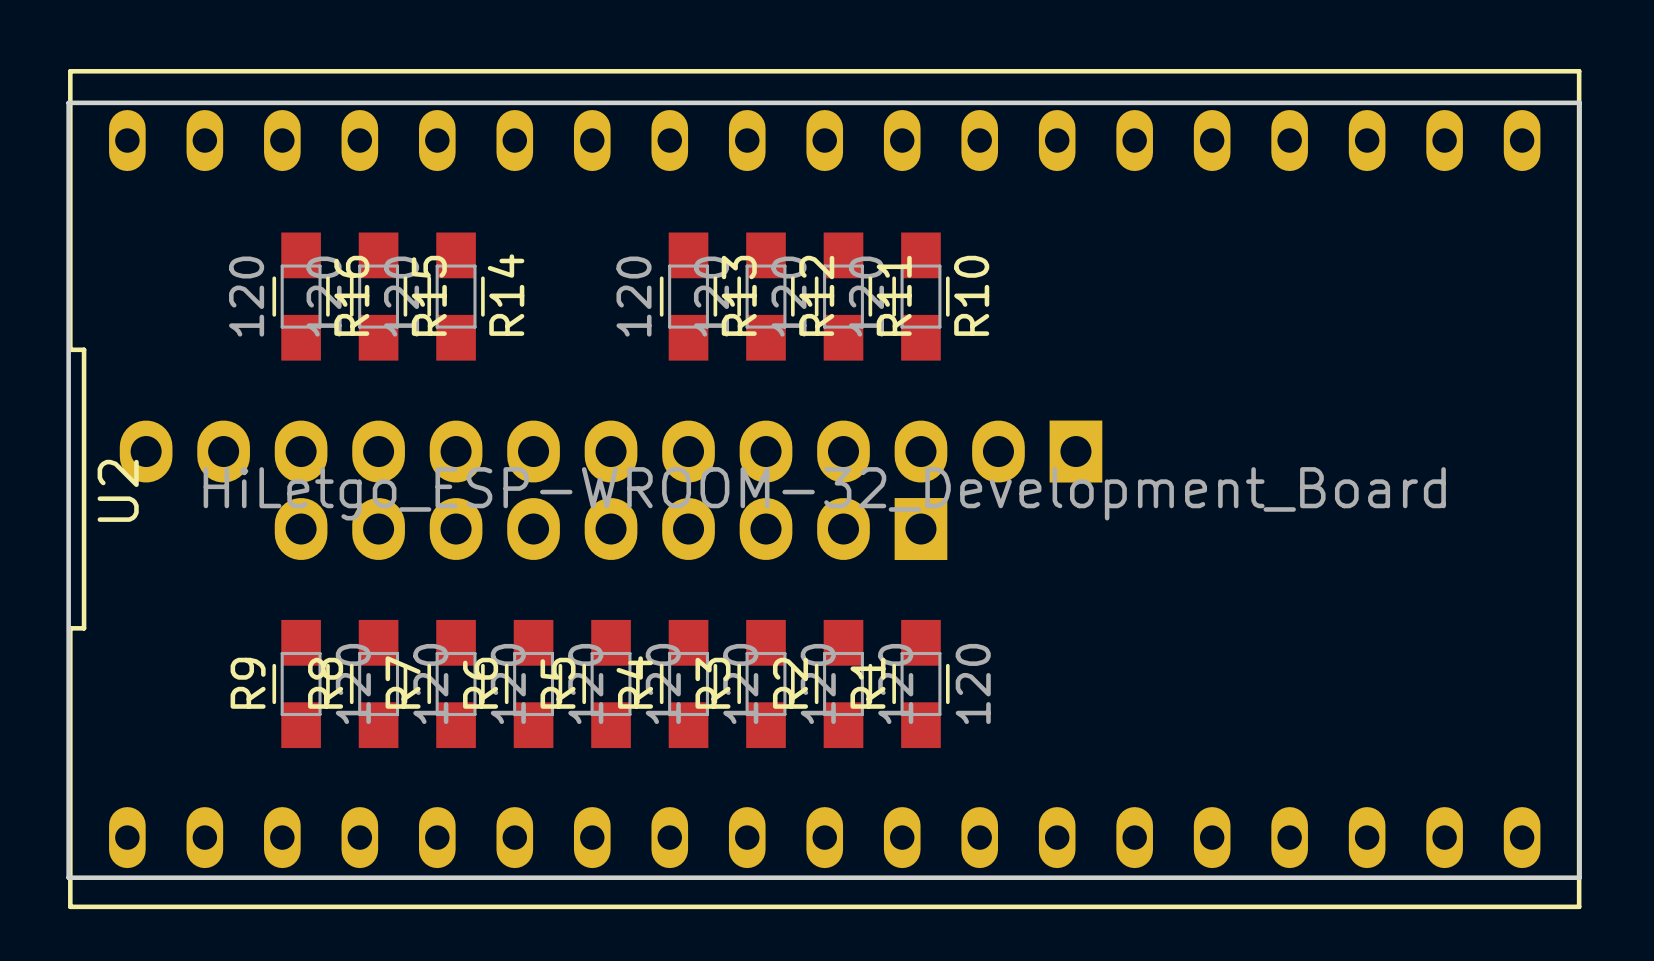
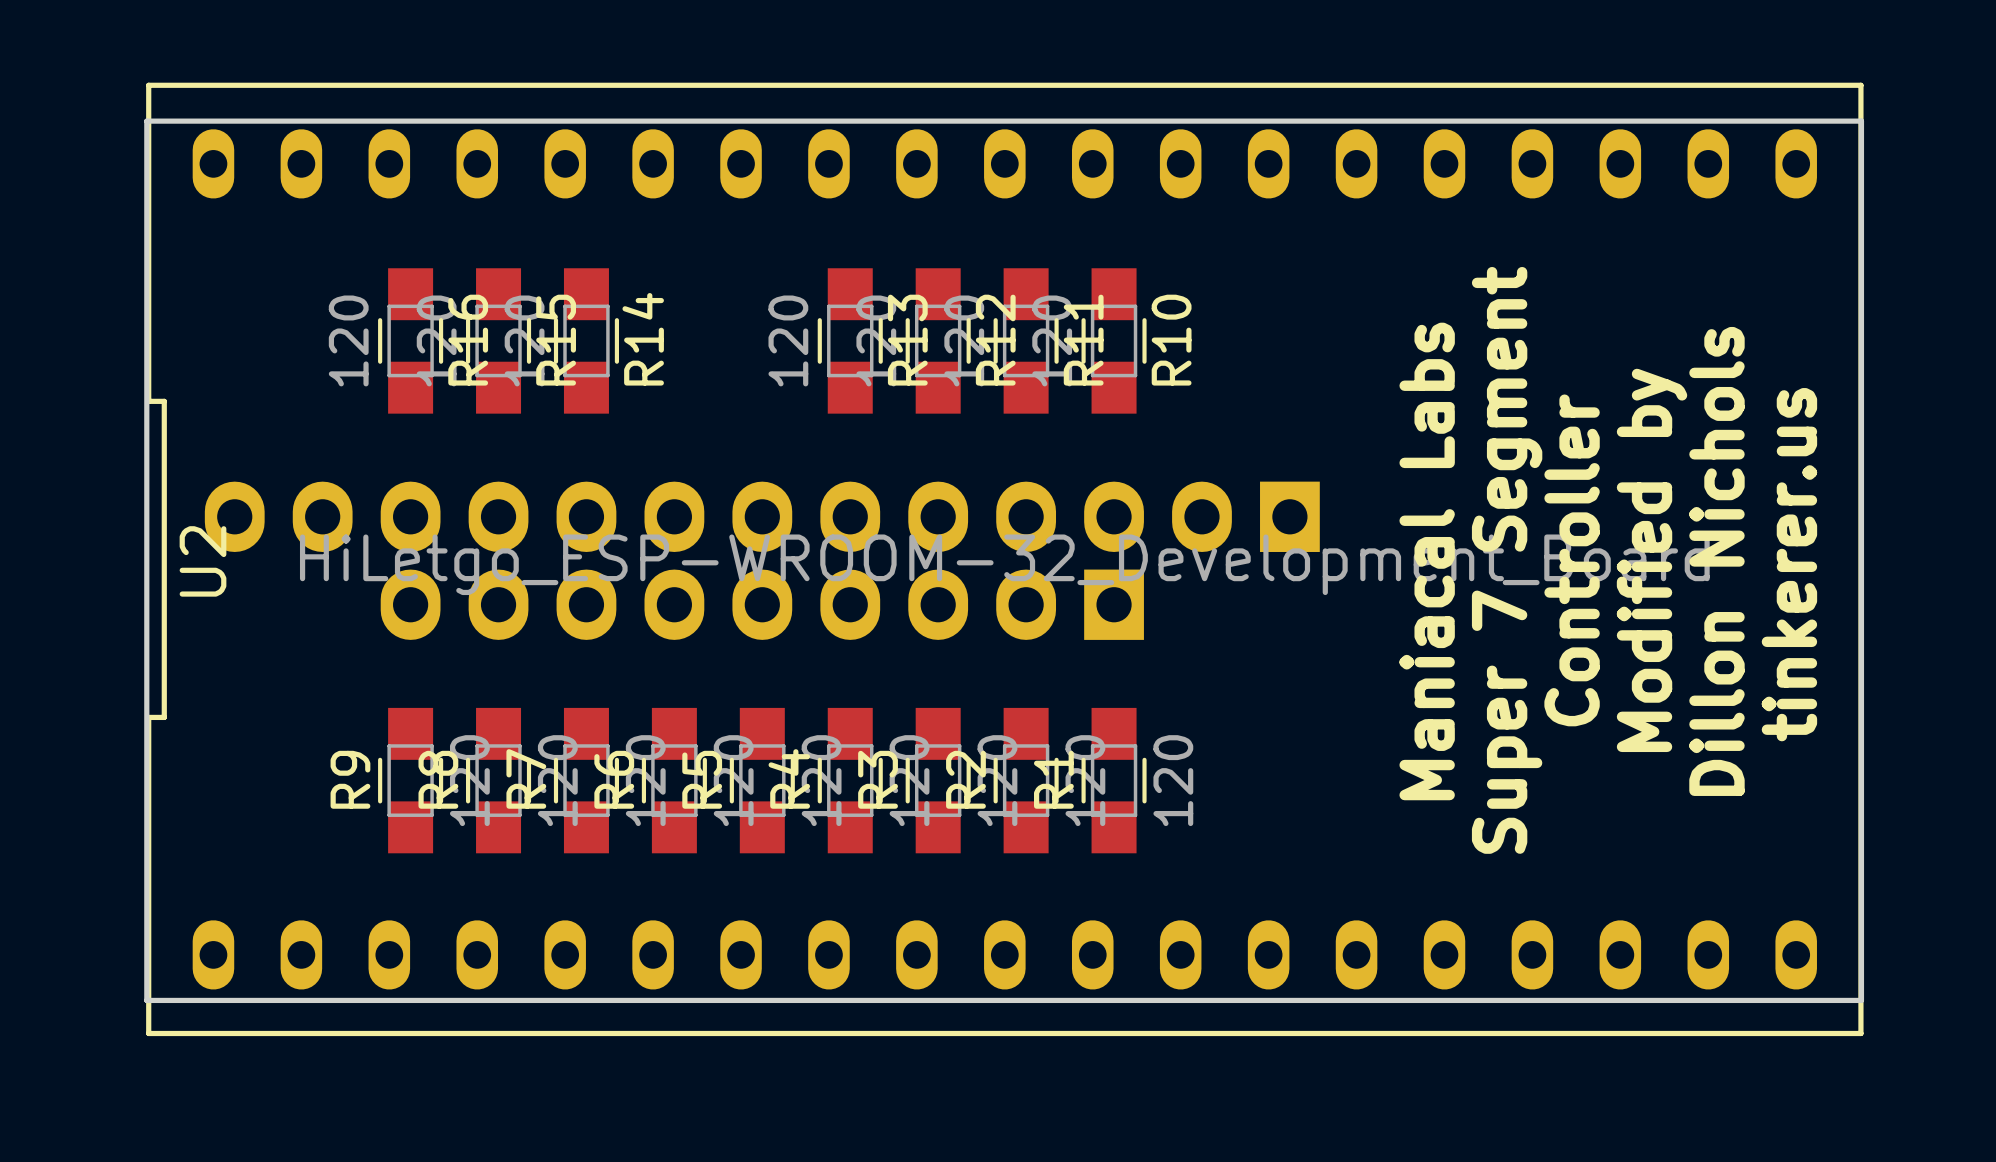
text: none -> Super 7 Segment (1507, 560)
text: none -> Controller (1572, 560)
text: none -> Modified by (1652, 560)
text: none -> Maniacal Labs (1427, 561)
text: none -> Dillon Nichols (1716, 561)
text: none -> tinkerer.us (1789, 564)

